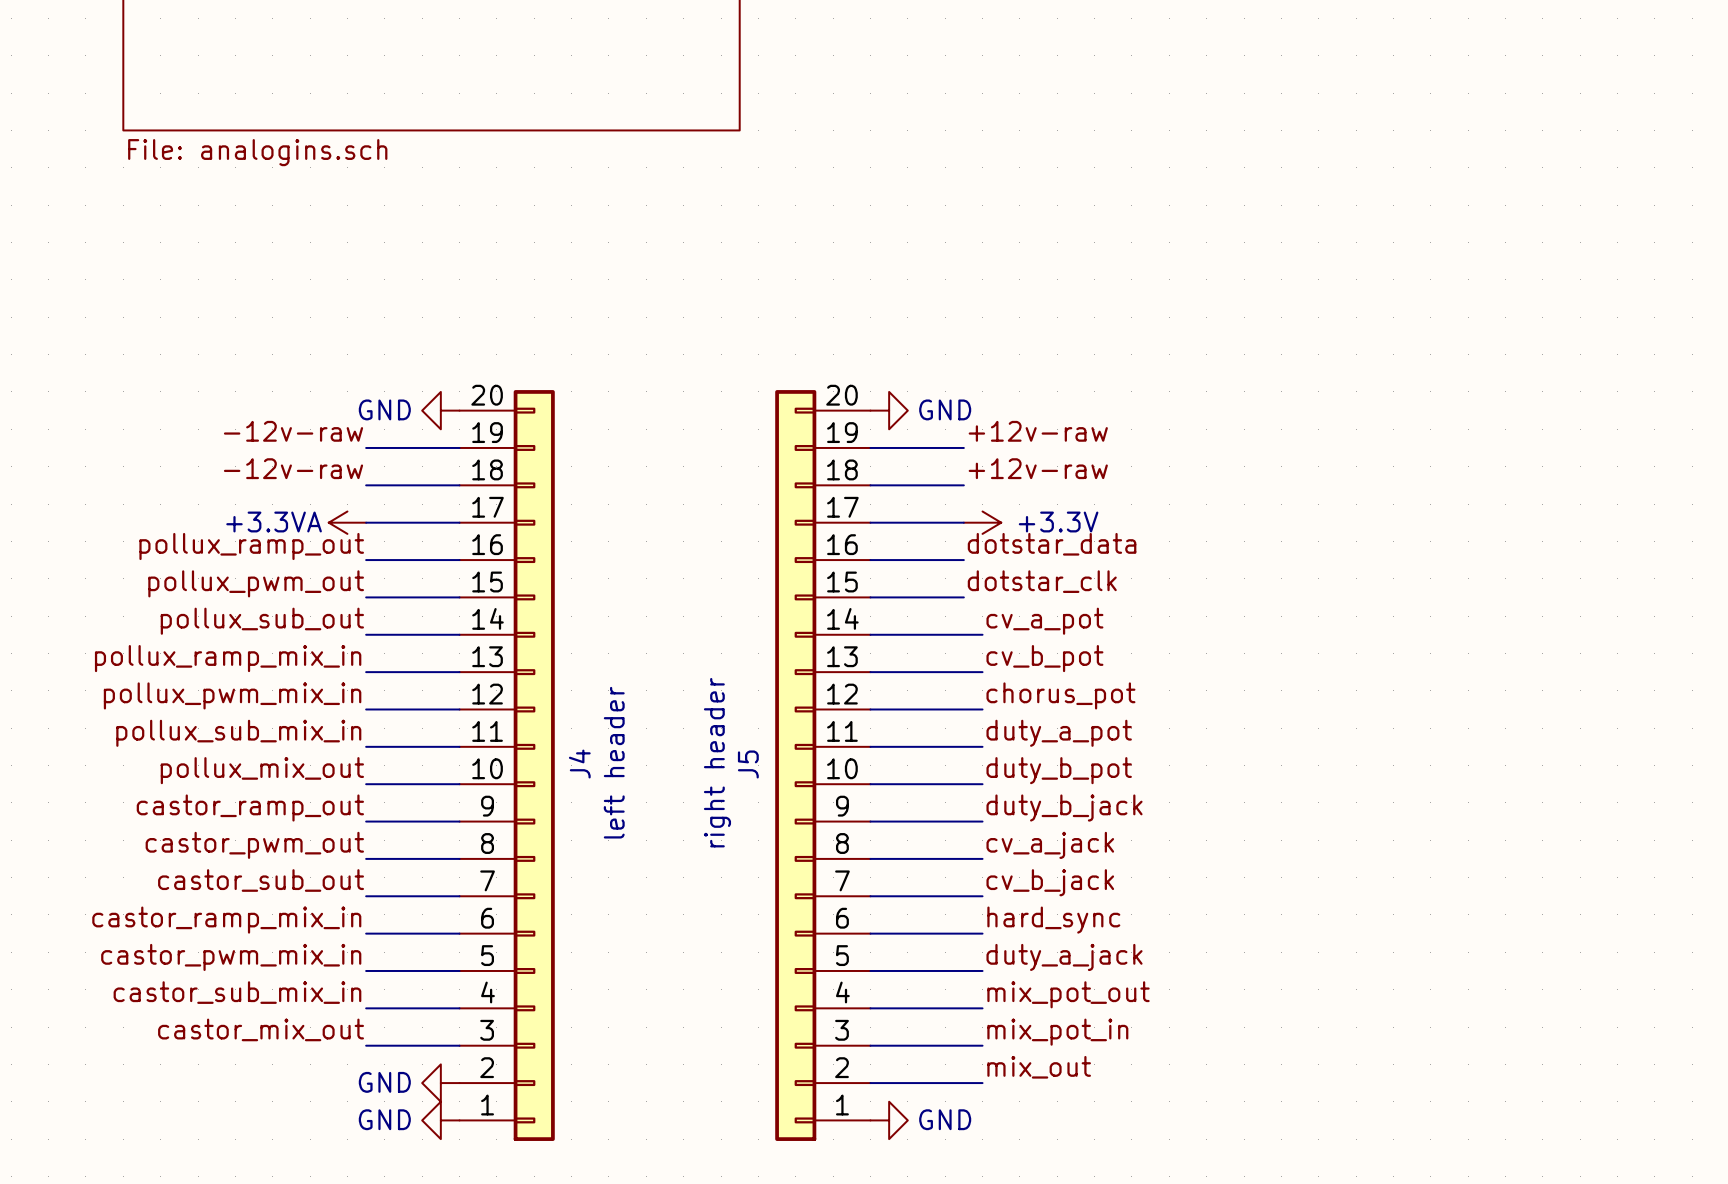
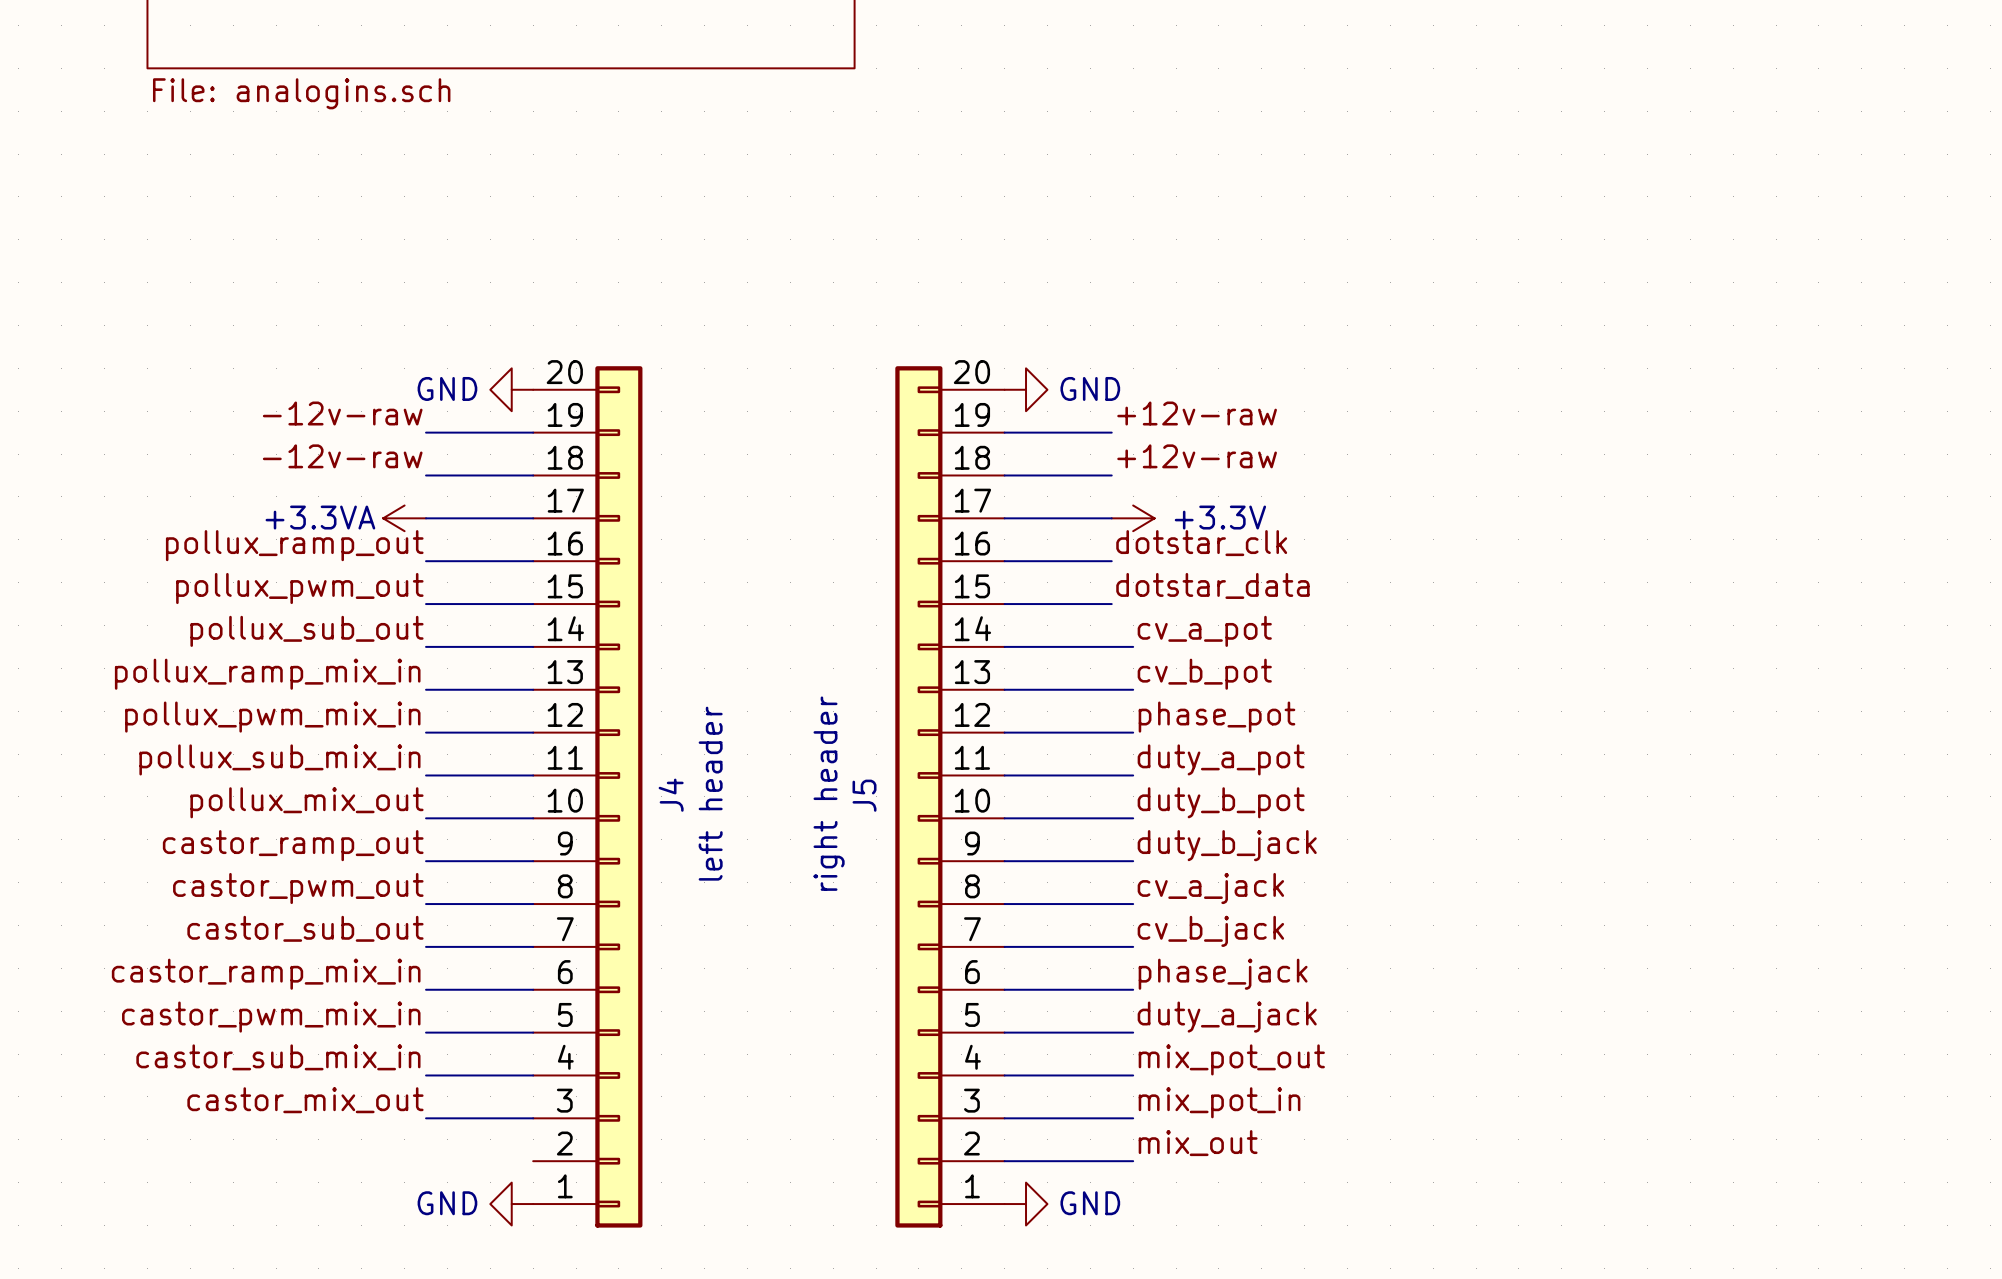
label: dotstar_data (1052, 544) -> dotstar_clk (1201, 543)
label: dotstar_clk (1042, 581) -> dotstar_data (1212, 585)
label: chorus_pot (1060, 695) -> phase_pot (1216, 717)
label: hard_sync (1053, 920) -> phase_jack (1223, 974)
power symbol: GND (440, 1083) -> none

